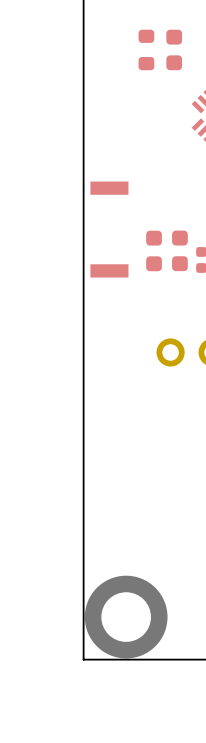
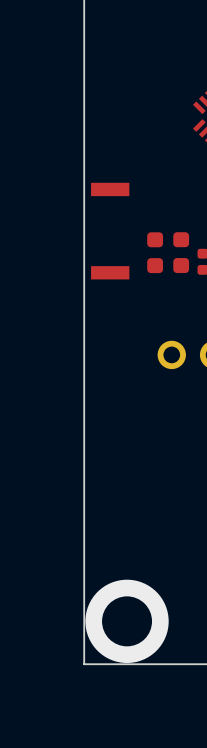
part: (146, 49) -> none
part: (174, 49) -> none

